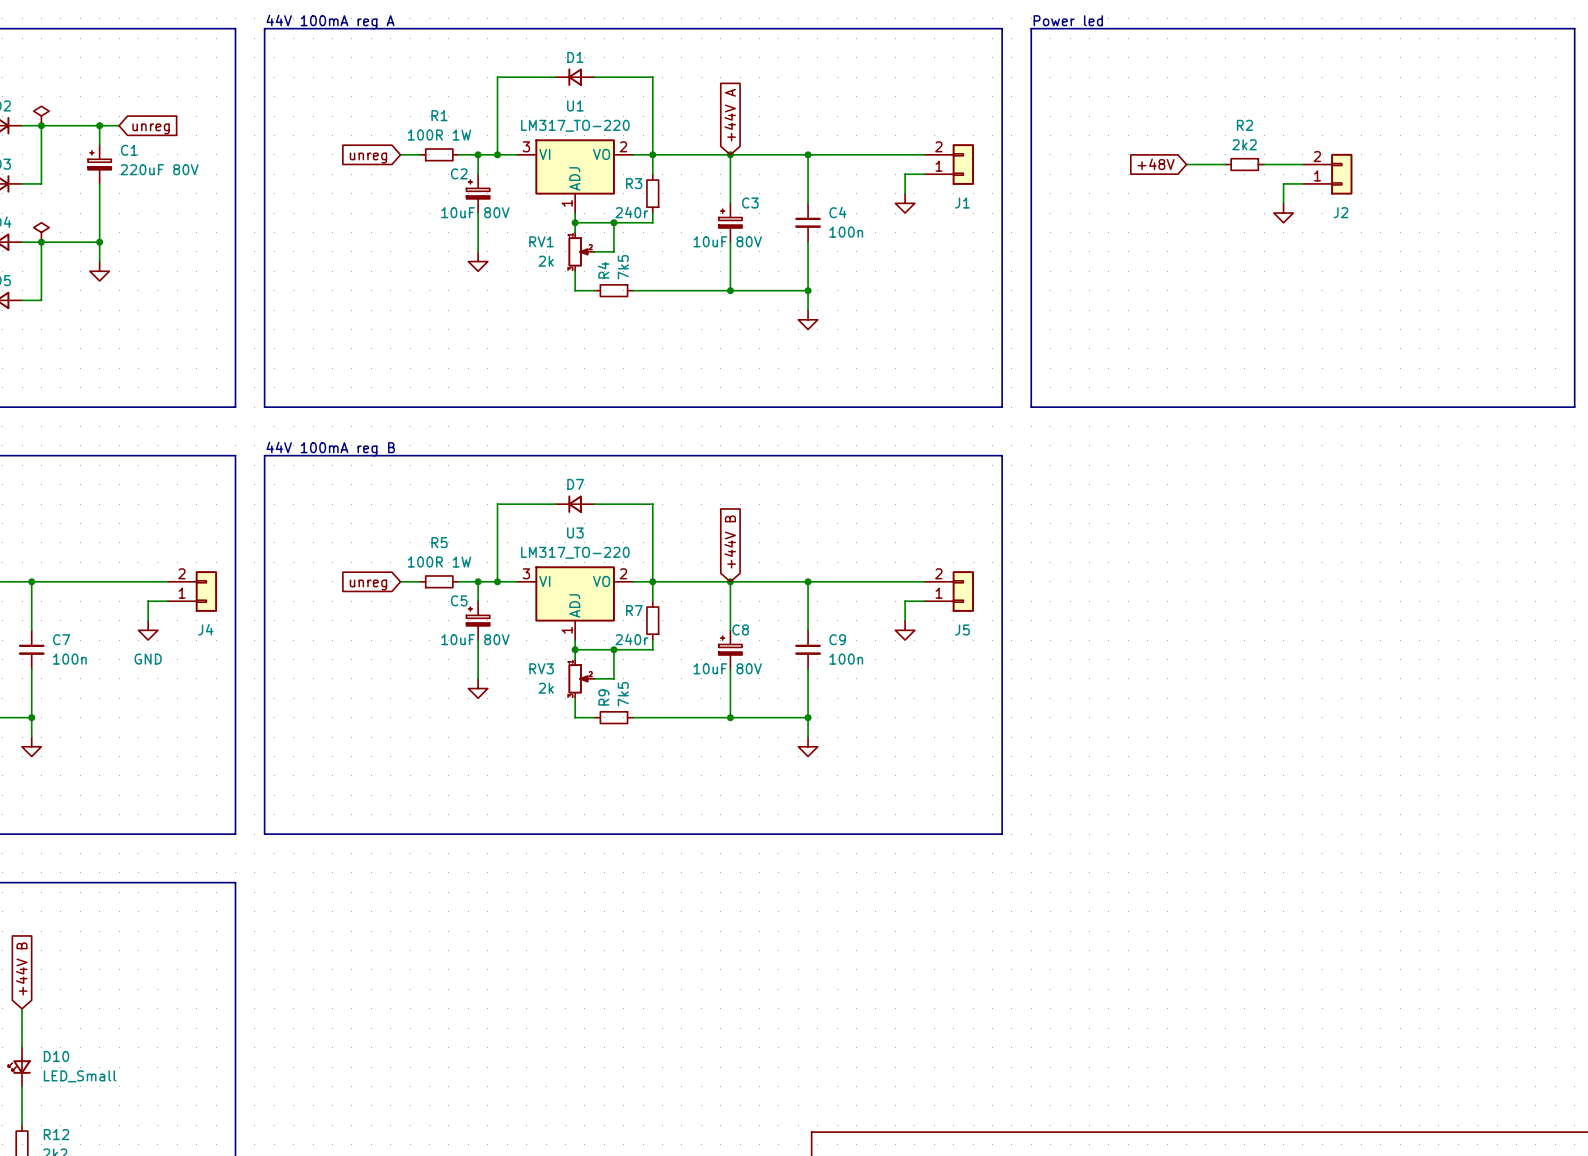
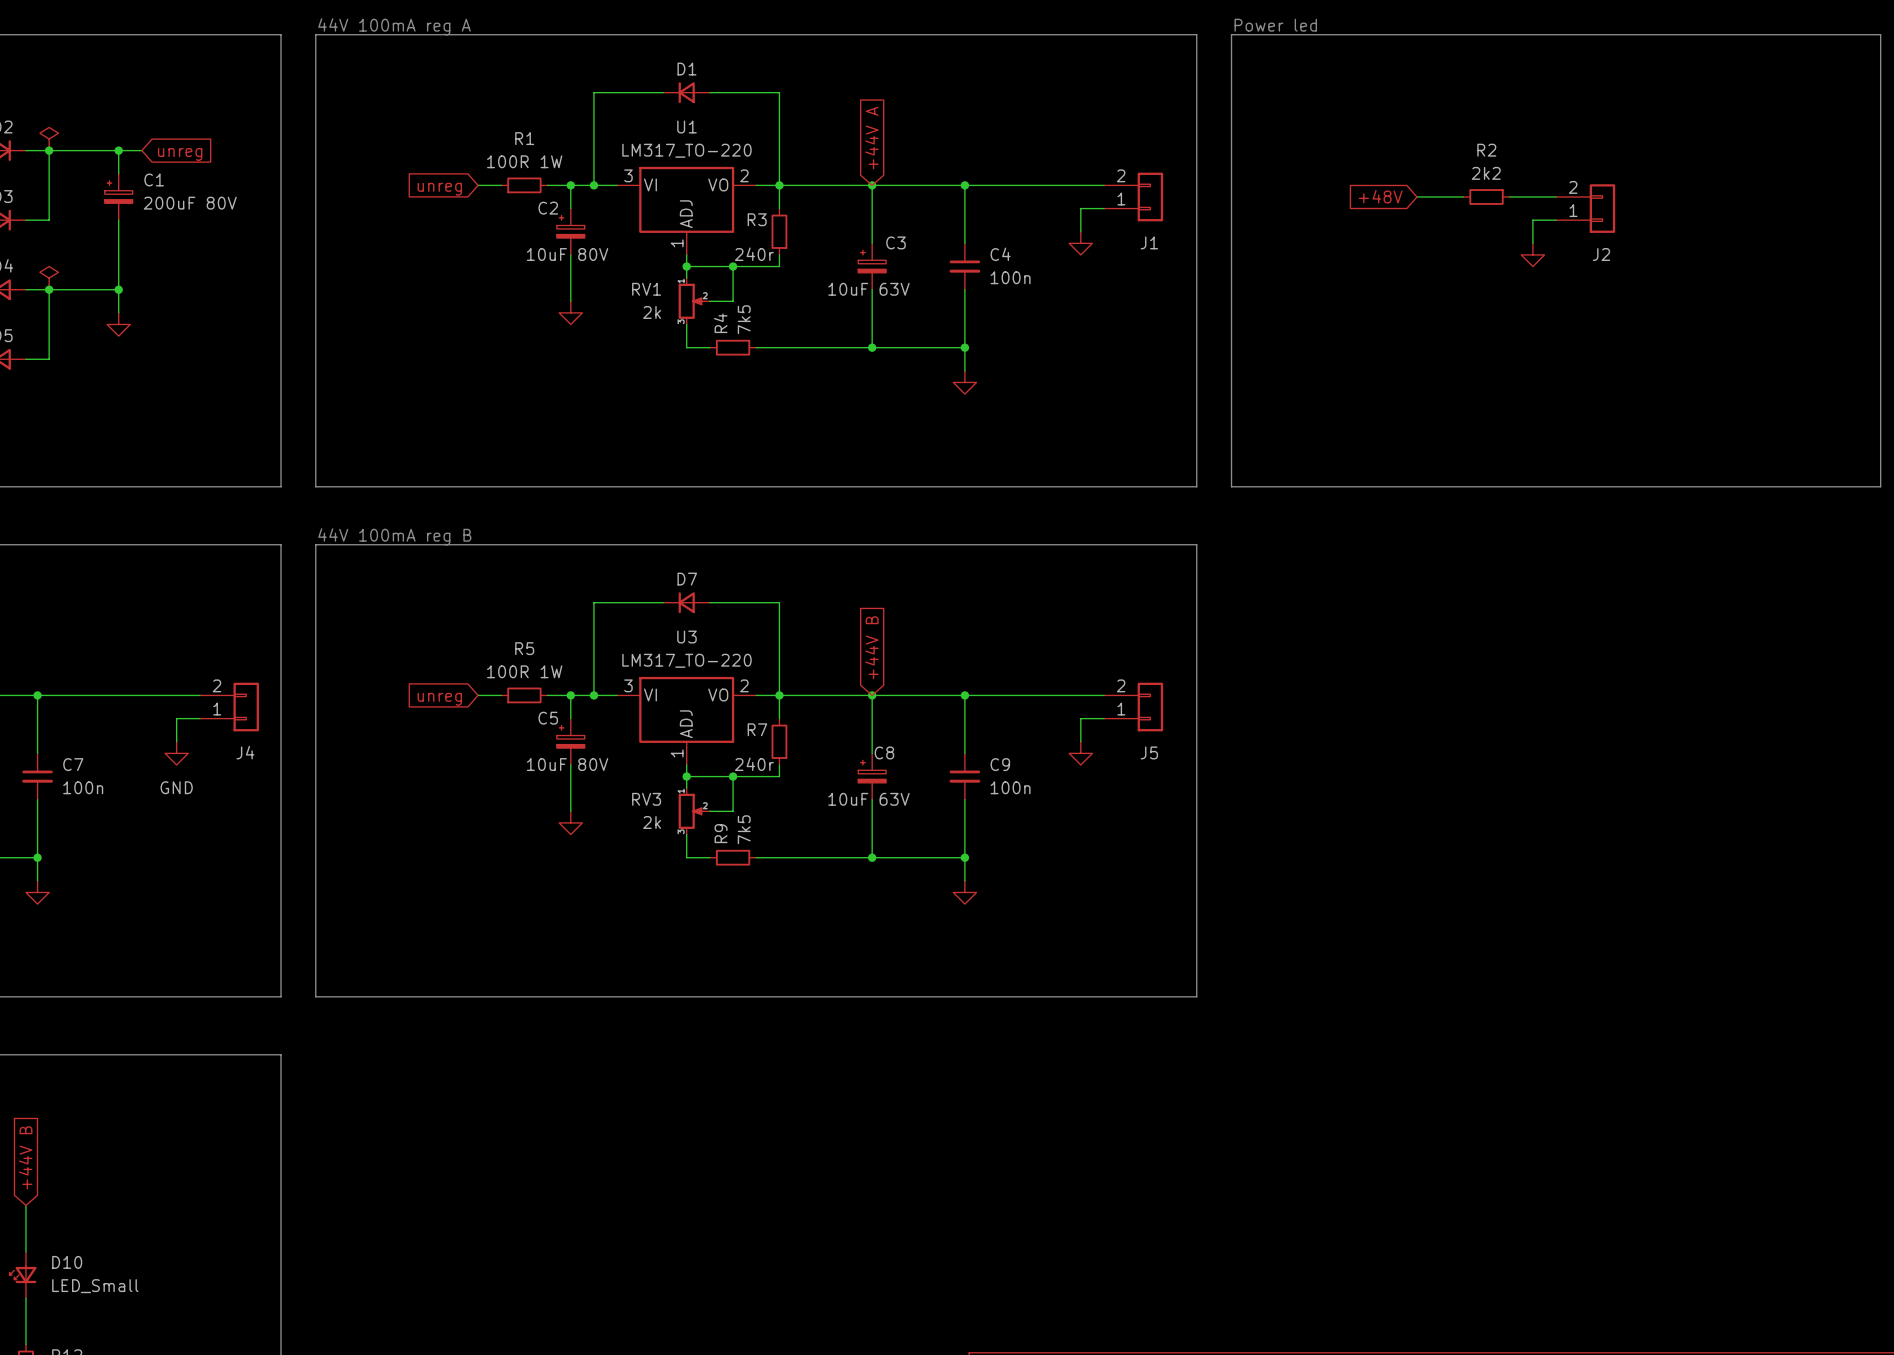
C1 value: 220uF 80V (159, 169) -> 200uF 80V (190, 203)
C3 value: 10uF 80V (727, 241) -> 10uF 63V (868, 289)
C8 value: 10uF 80V (727, 668) -> 10uF 63V (868, 799)

